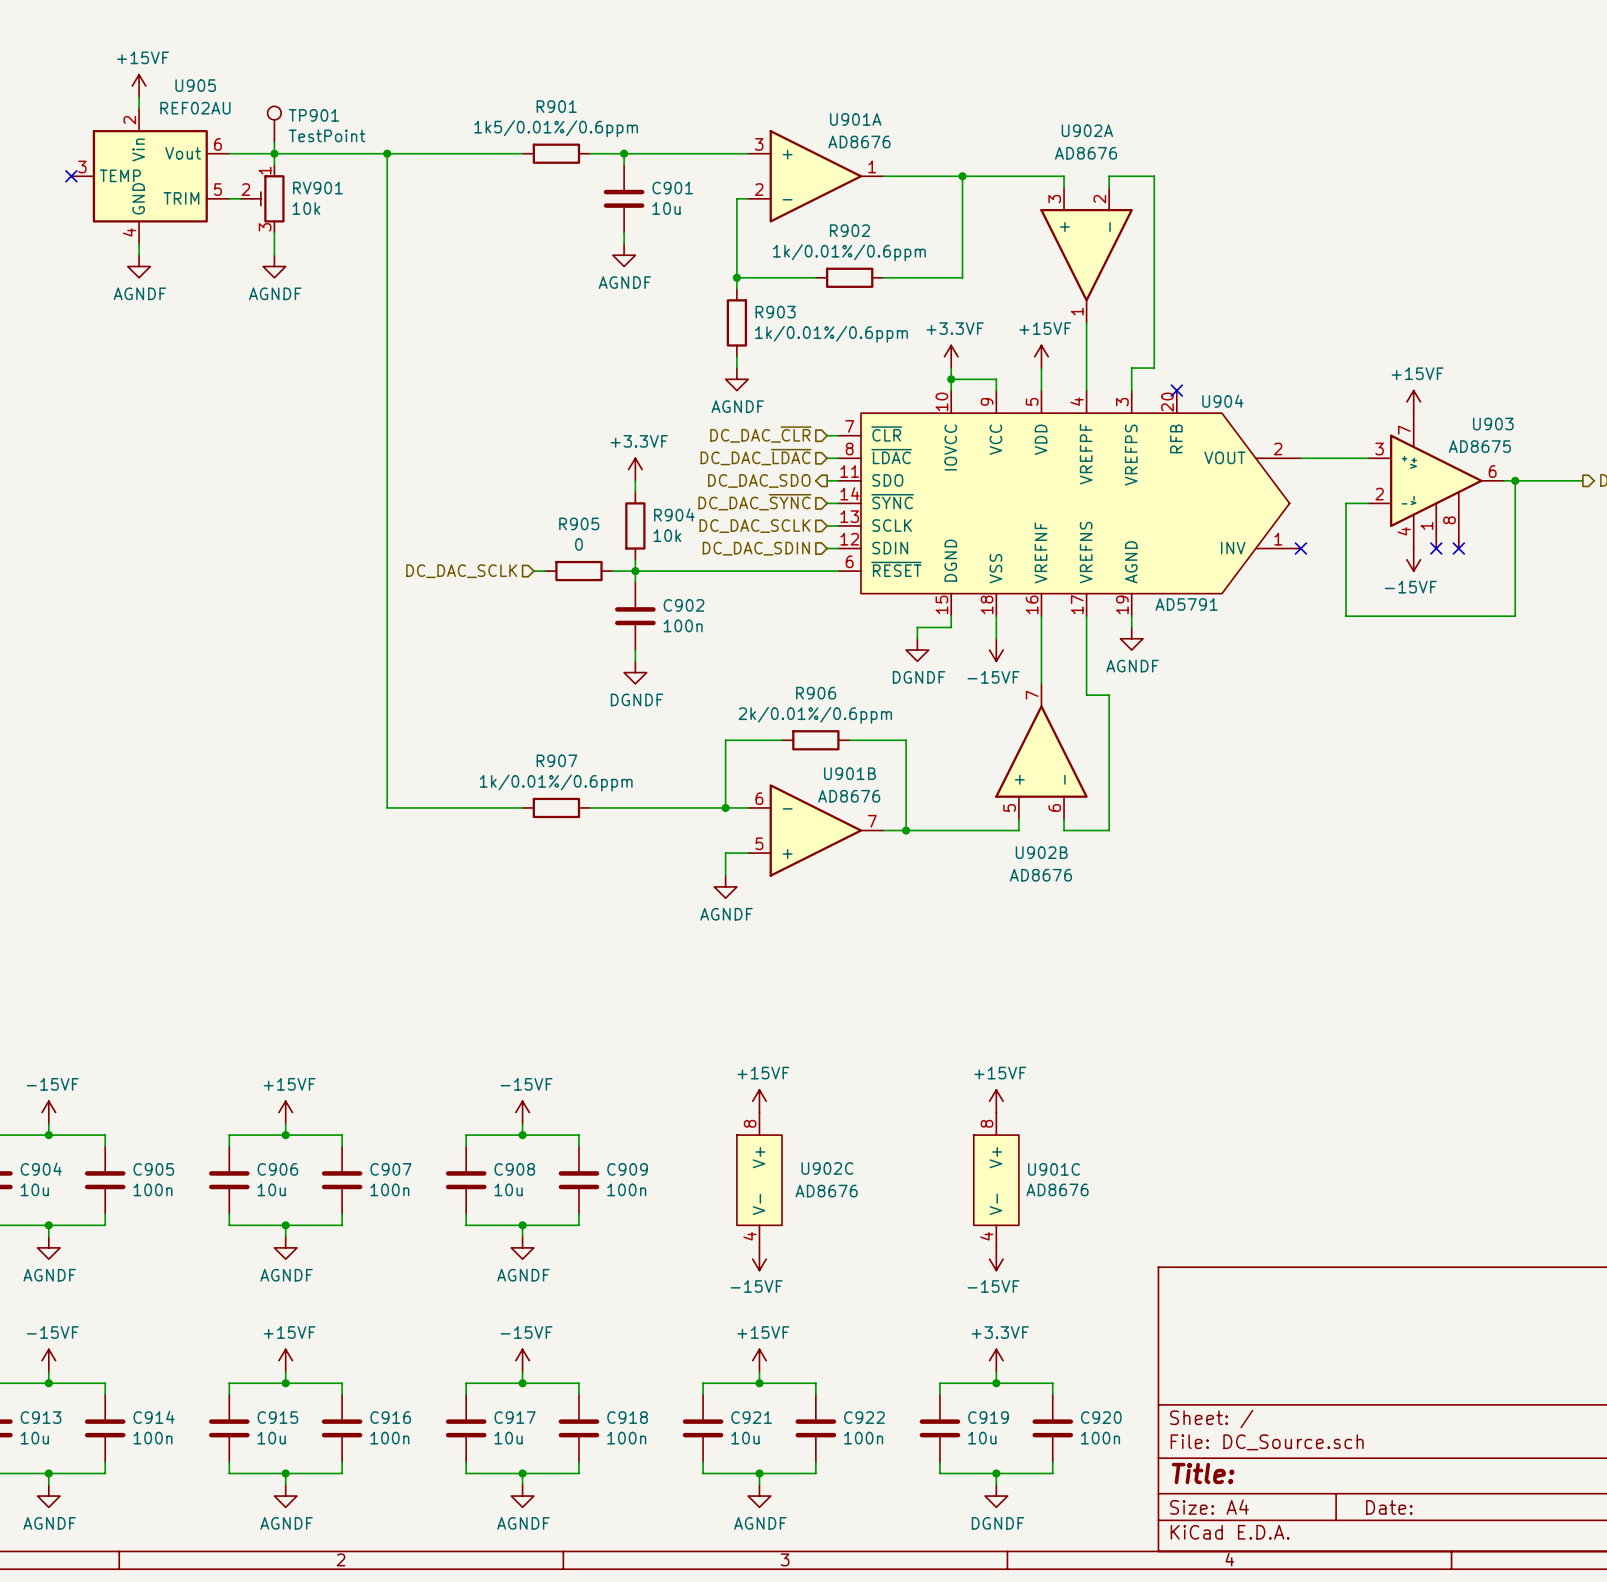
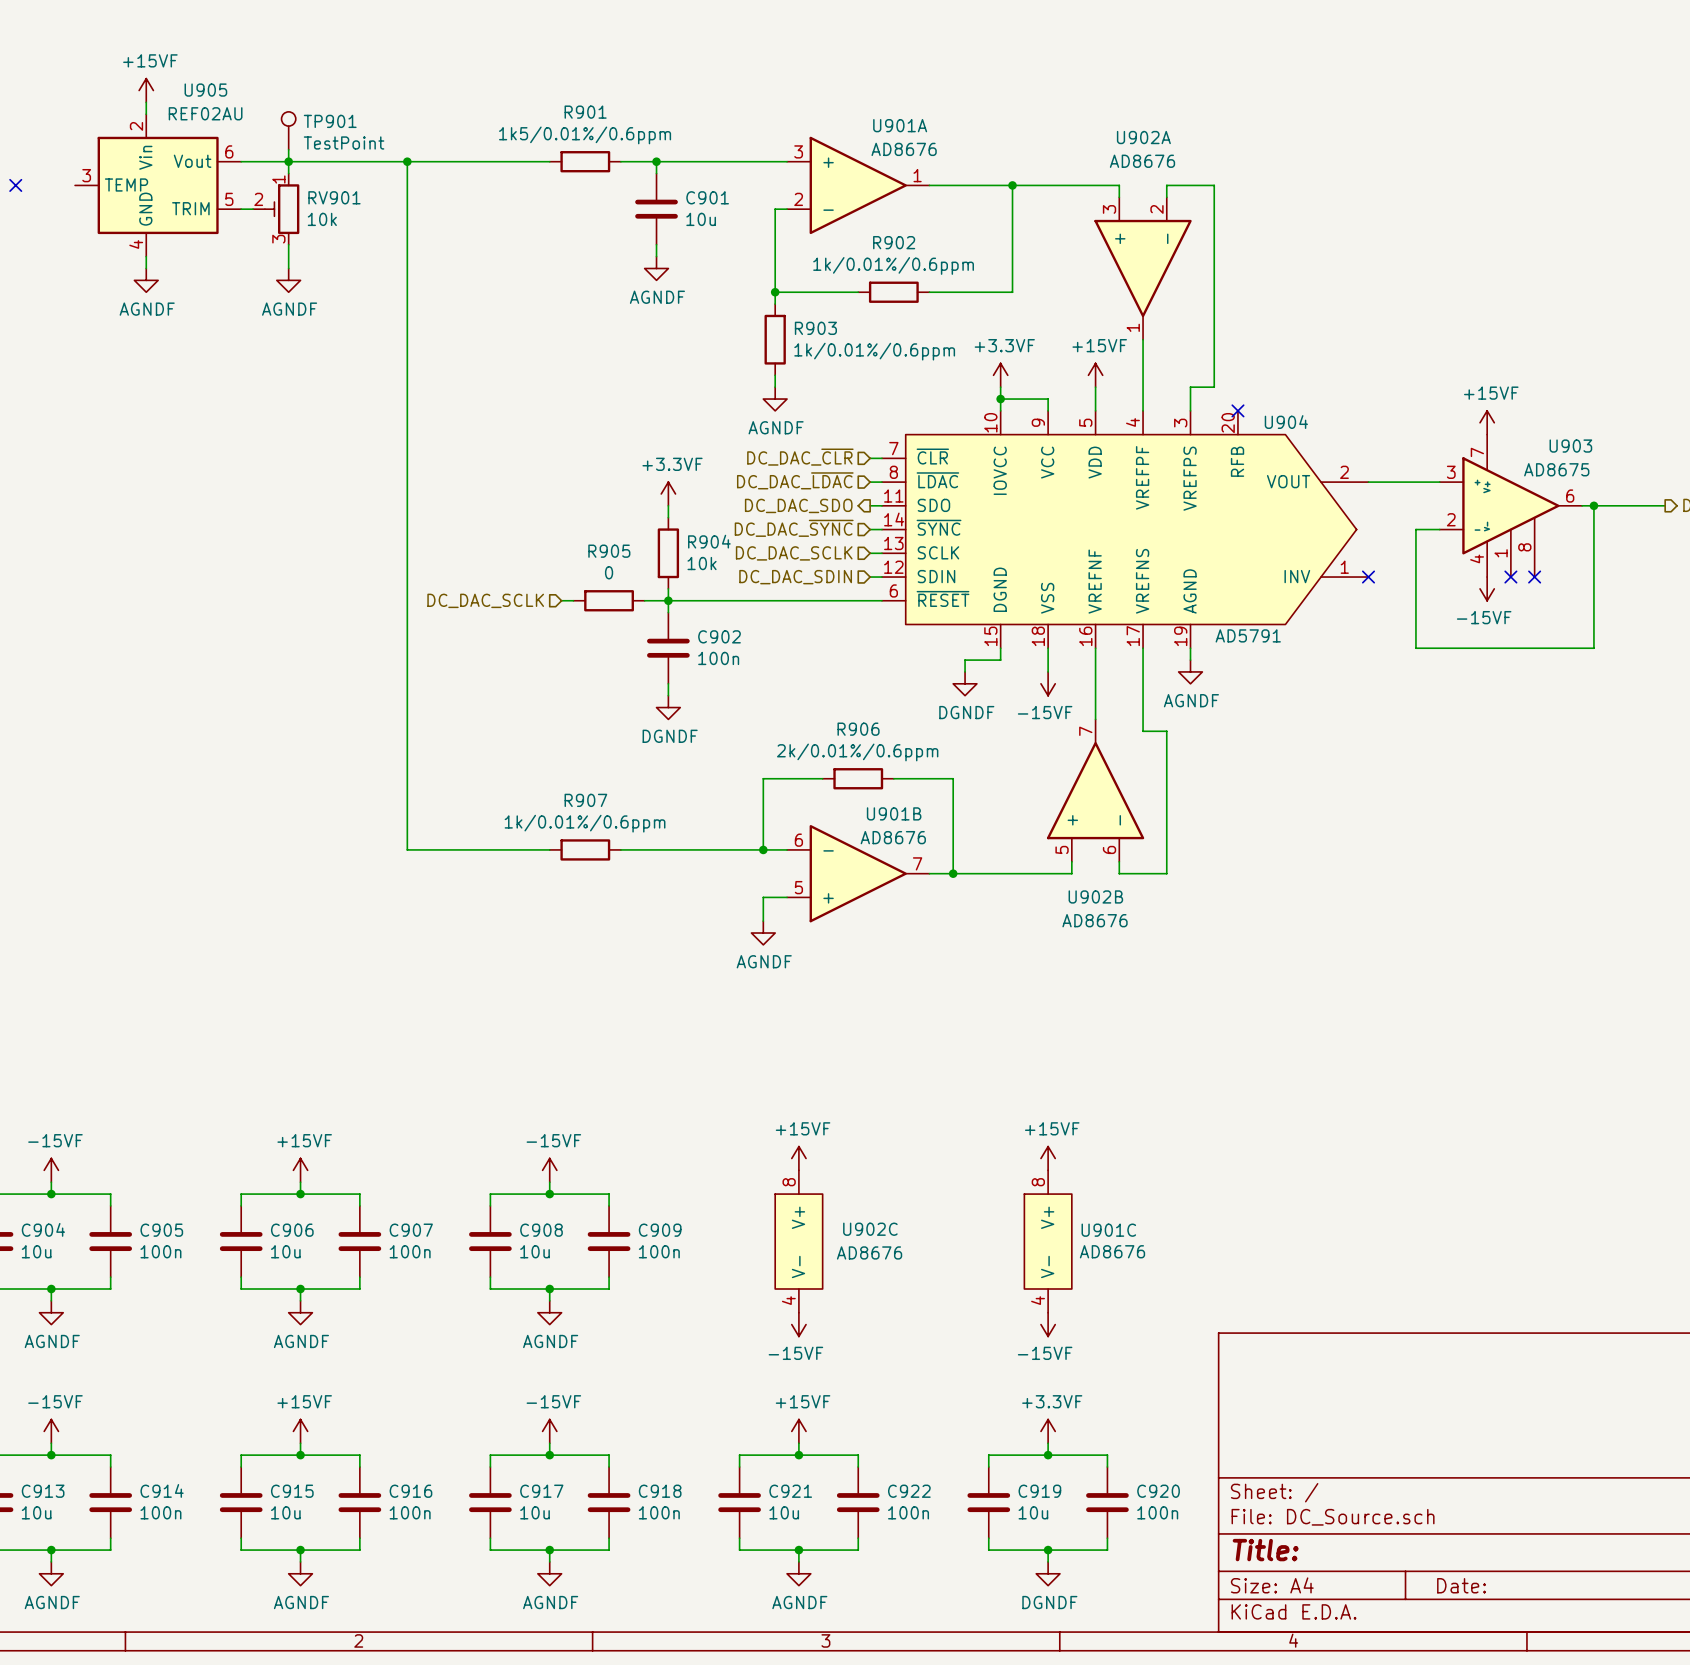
no-connect mark: none -> (15, 185)
no-connect mark: (71, 176) -> none

